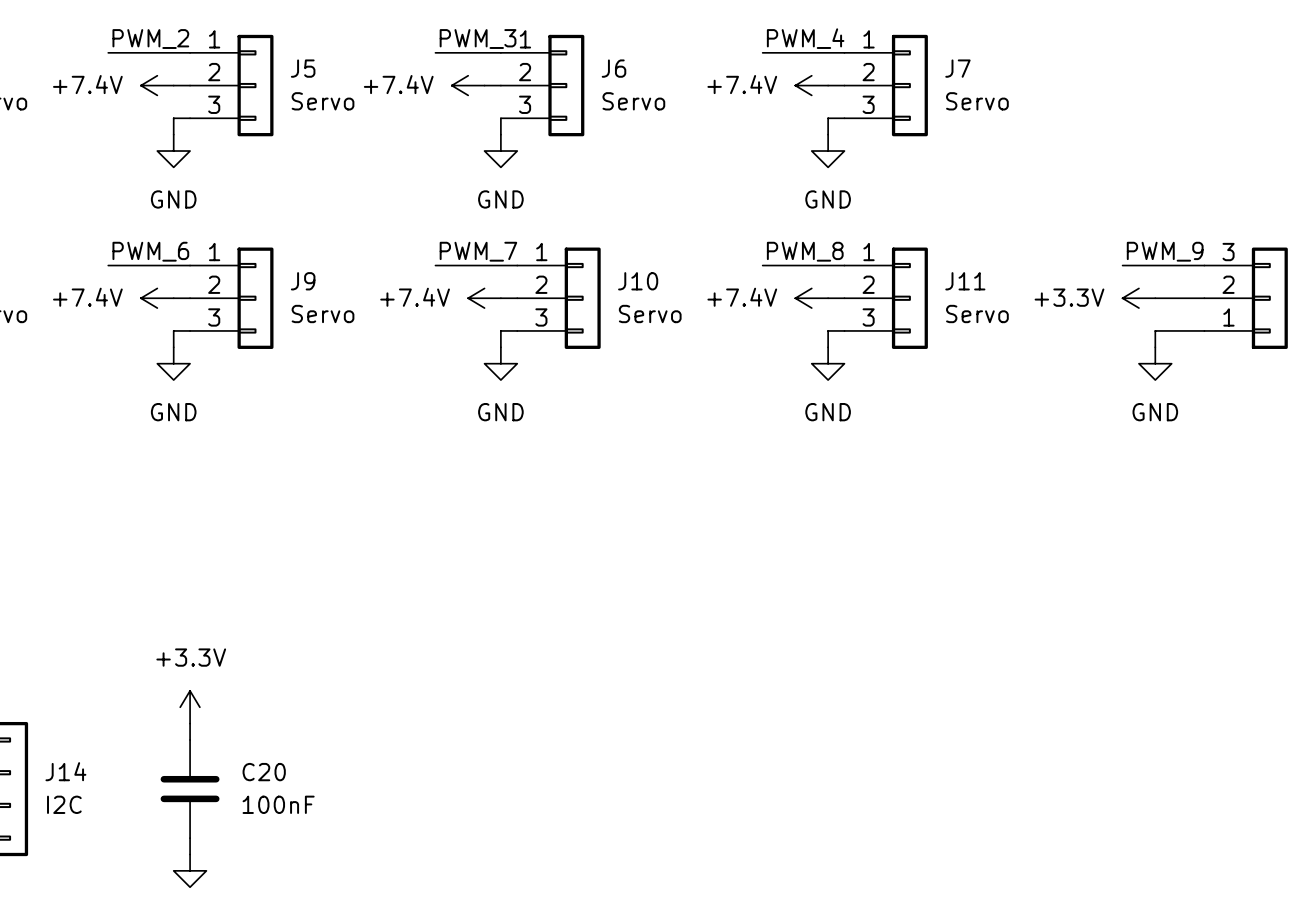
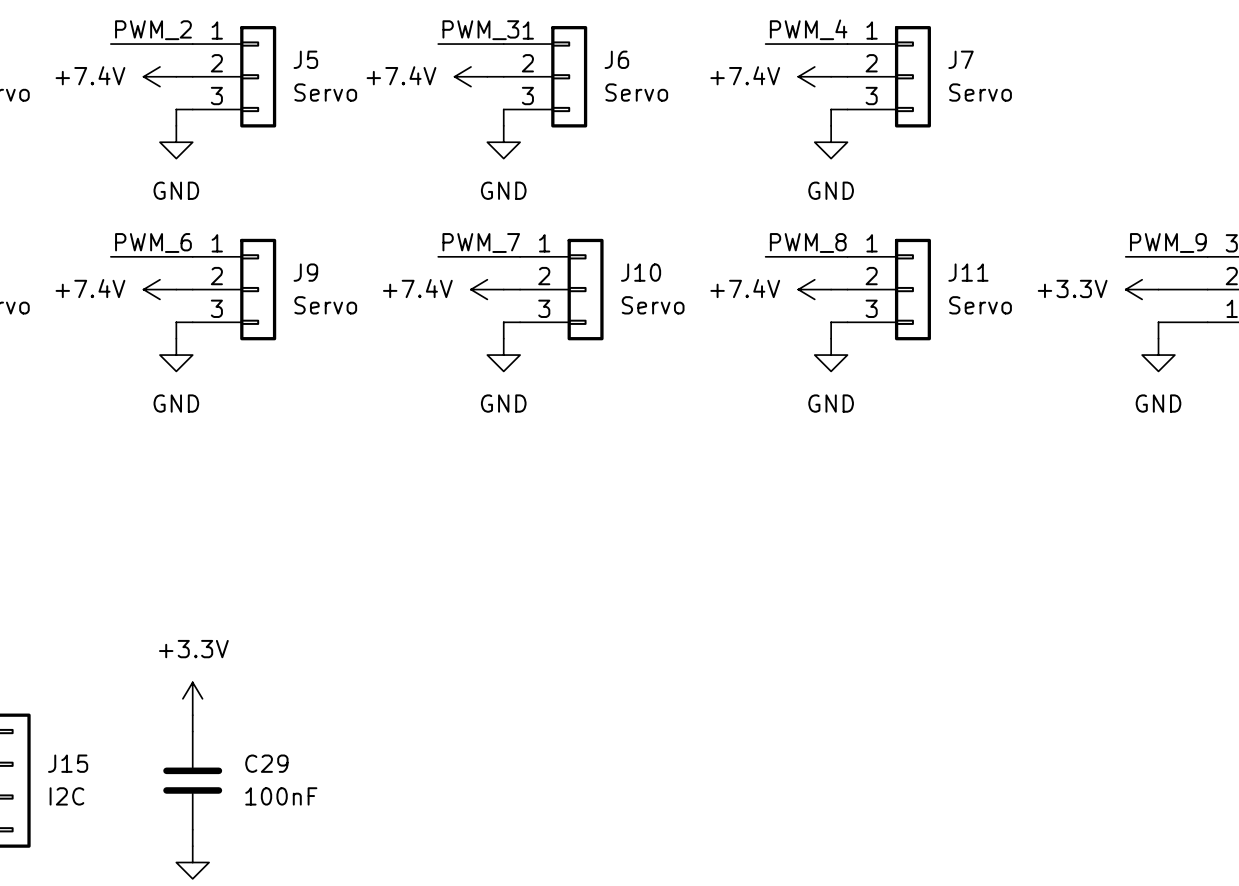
J14 name: J14 (65, 771) -> J15 (68, 763)
C20 name: C20 (264, 772) -> C29 (266, 763)

